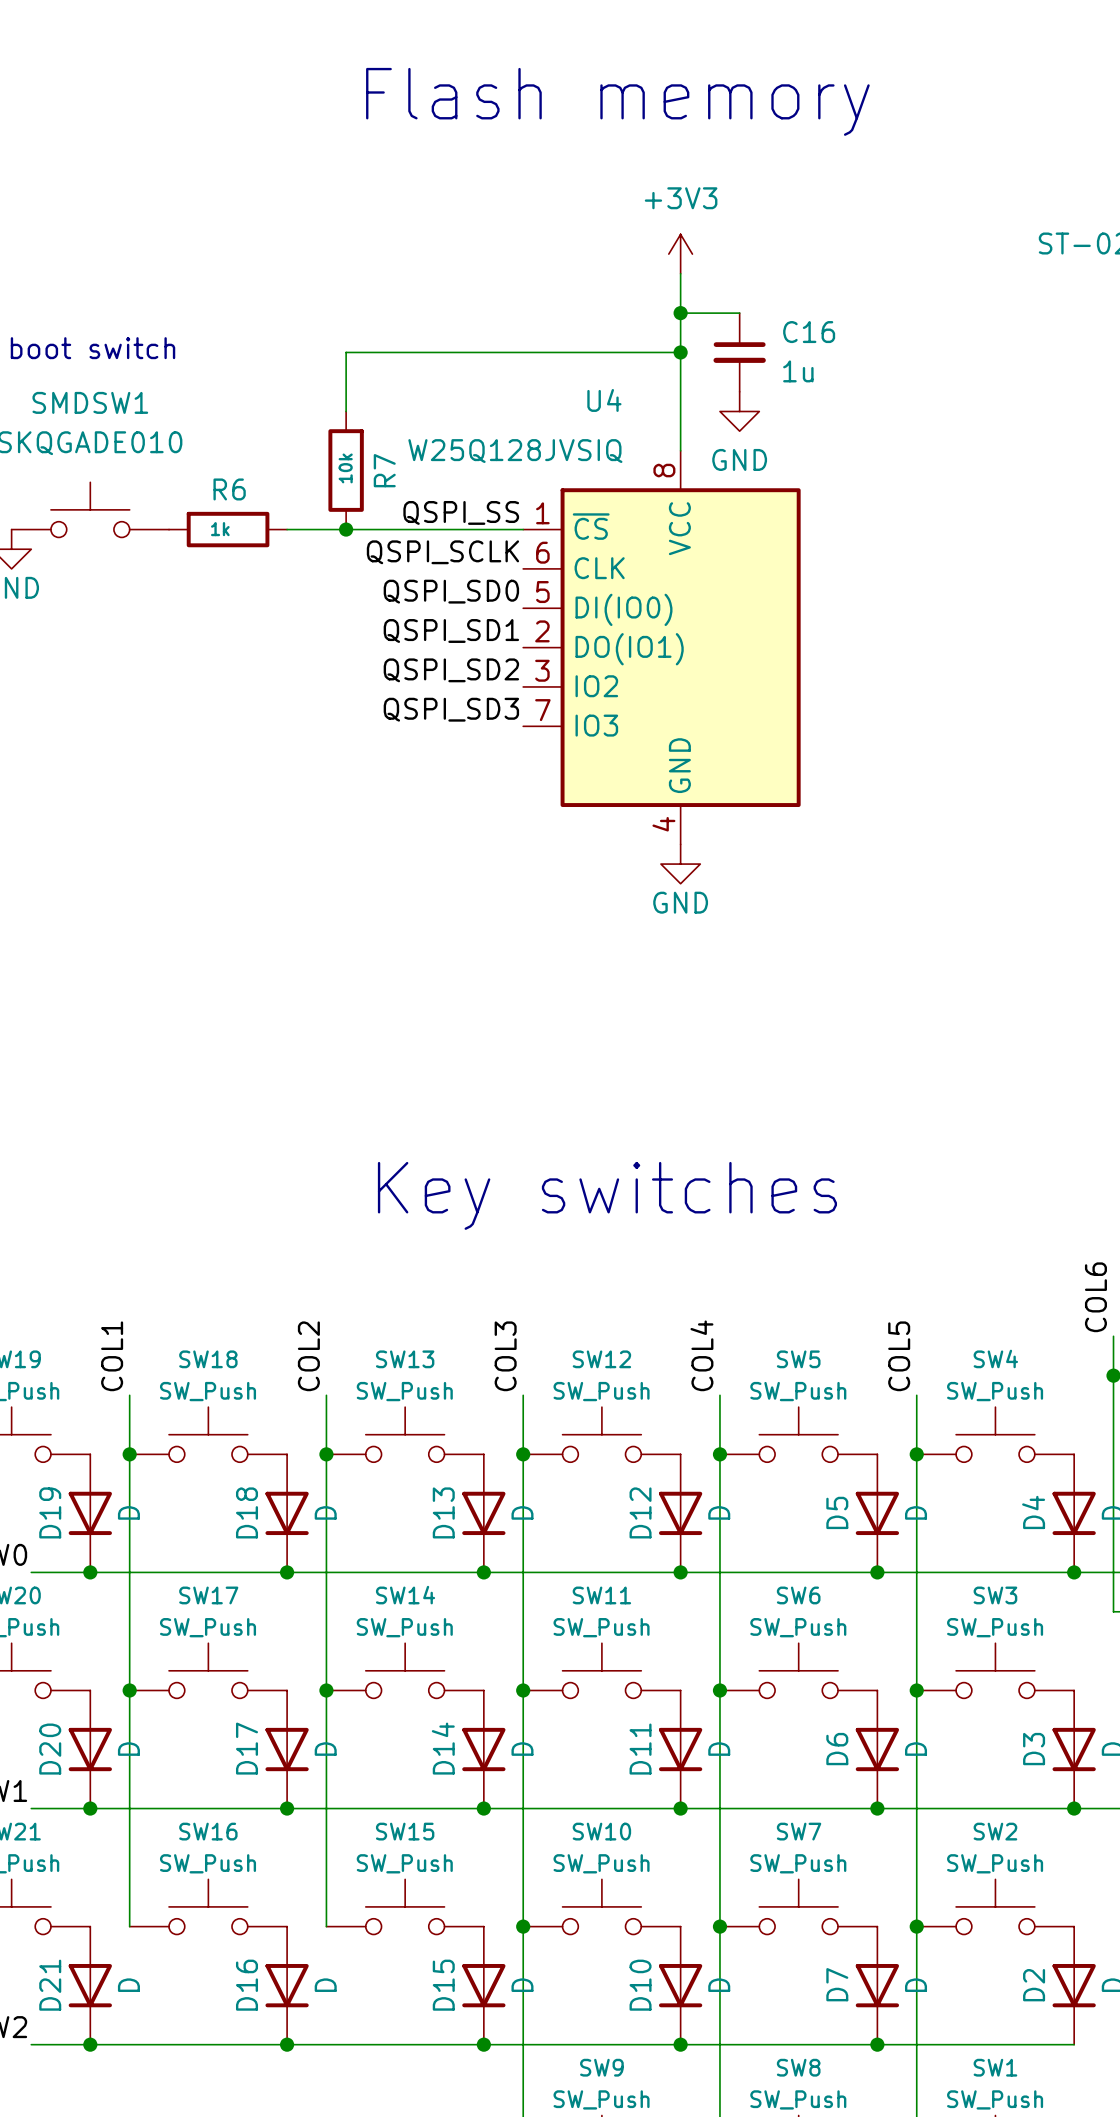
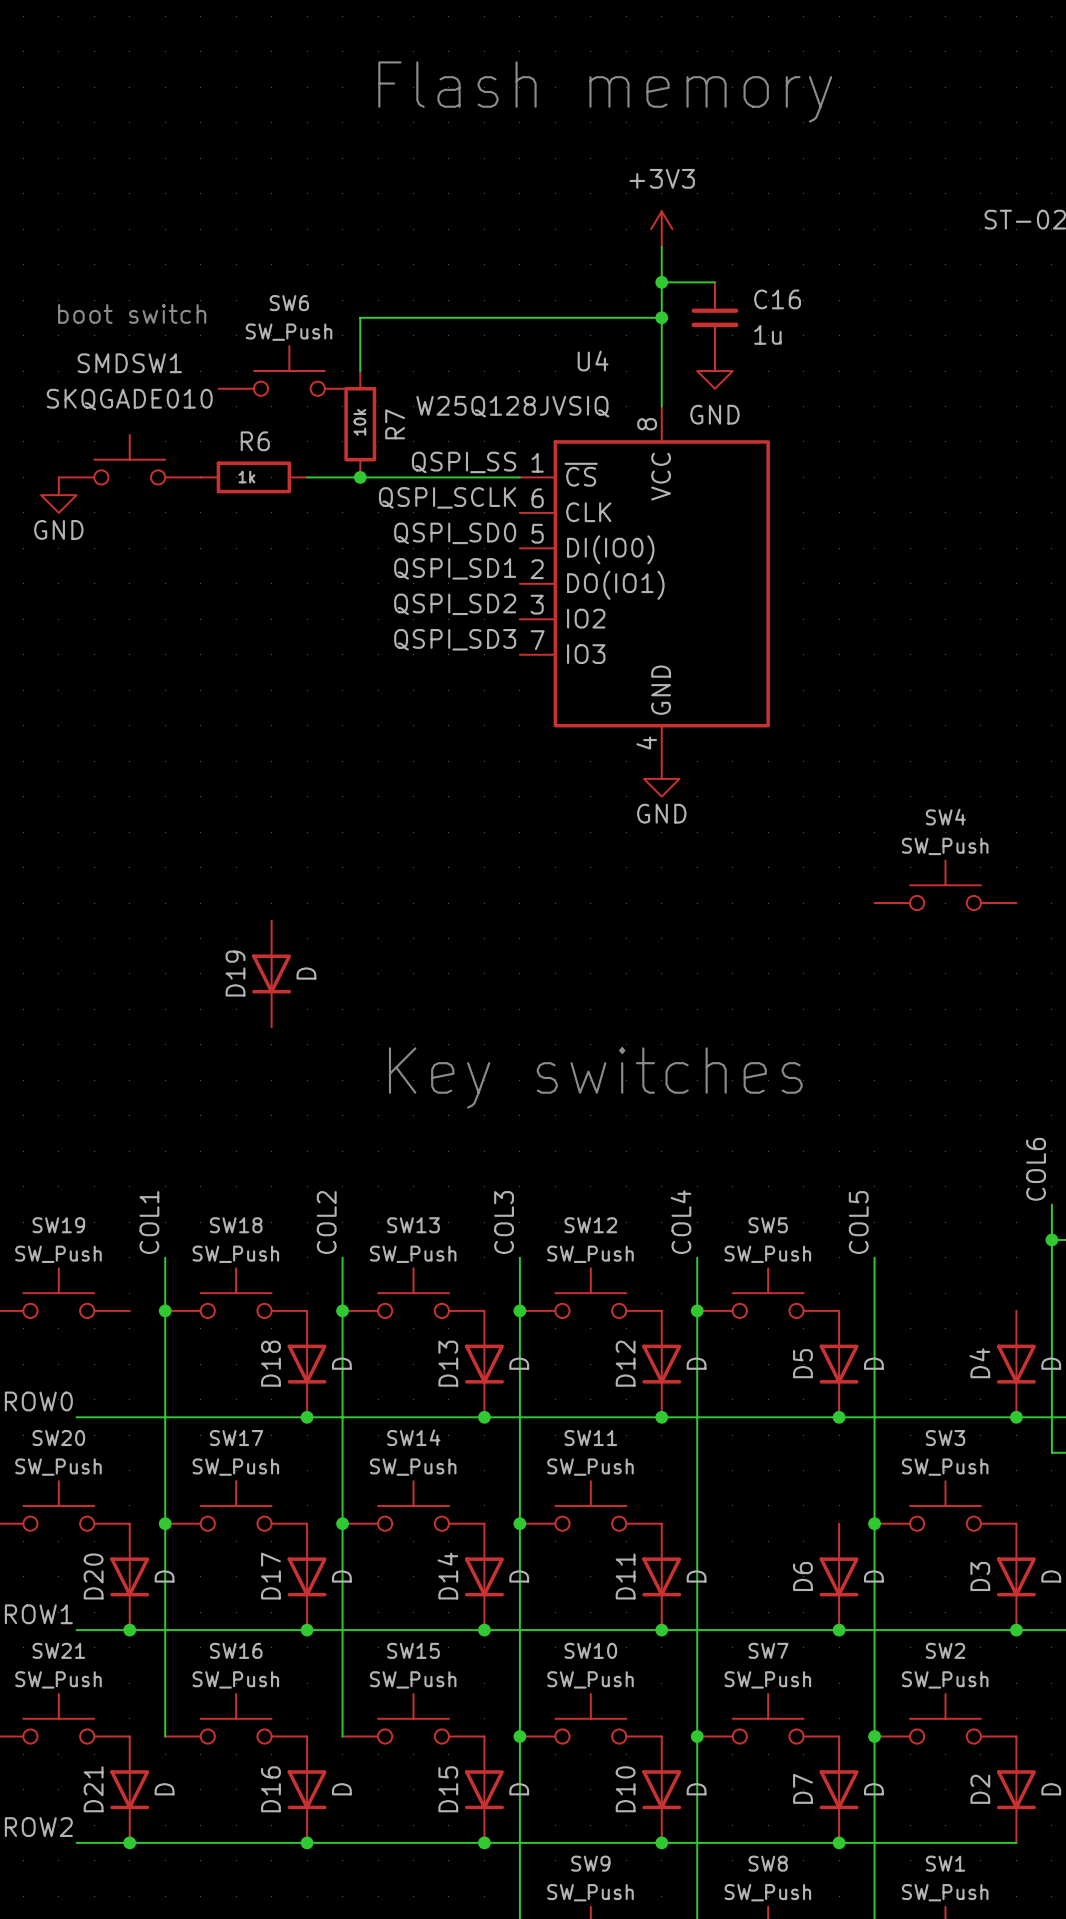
SW4 position: (995, 1434) -> (945, 885)
junction: (916, 1454) -> none
D19 position: (90, 1513) -> (271, 973)
junction: (90, 1572) -> none
SW6 position: (798, 1670) -> (289, 371)
junction: (719, 1690) -> none

